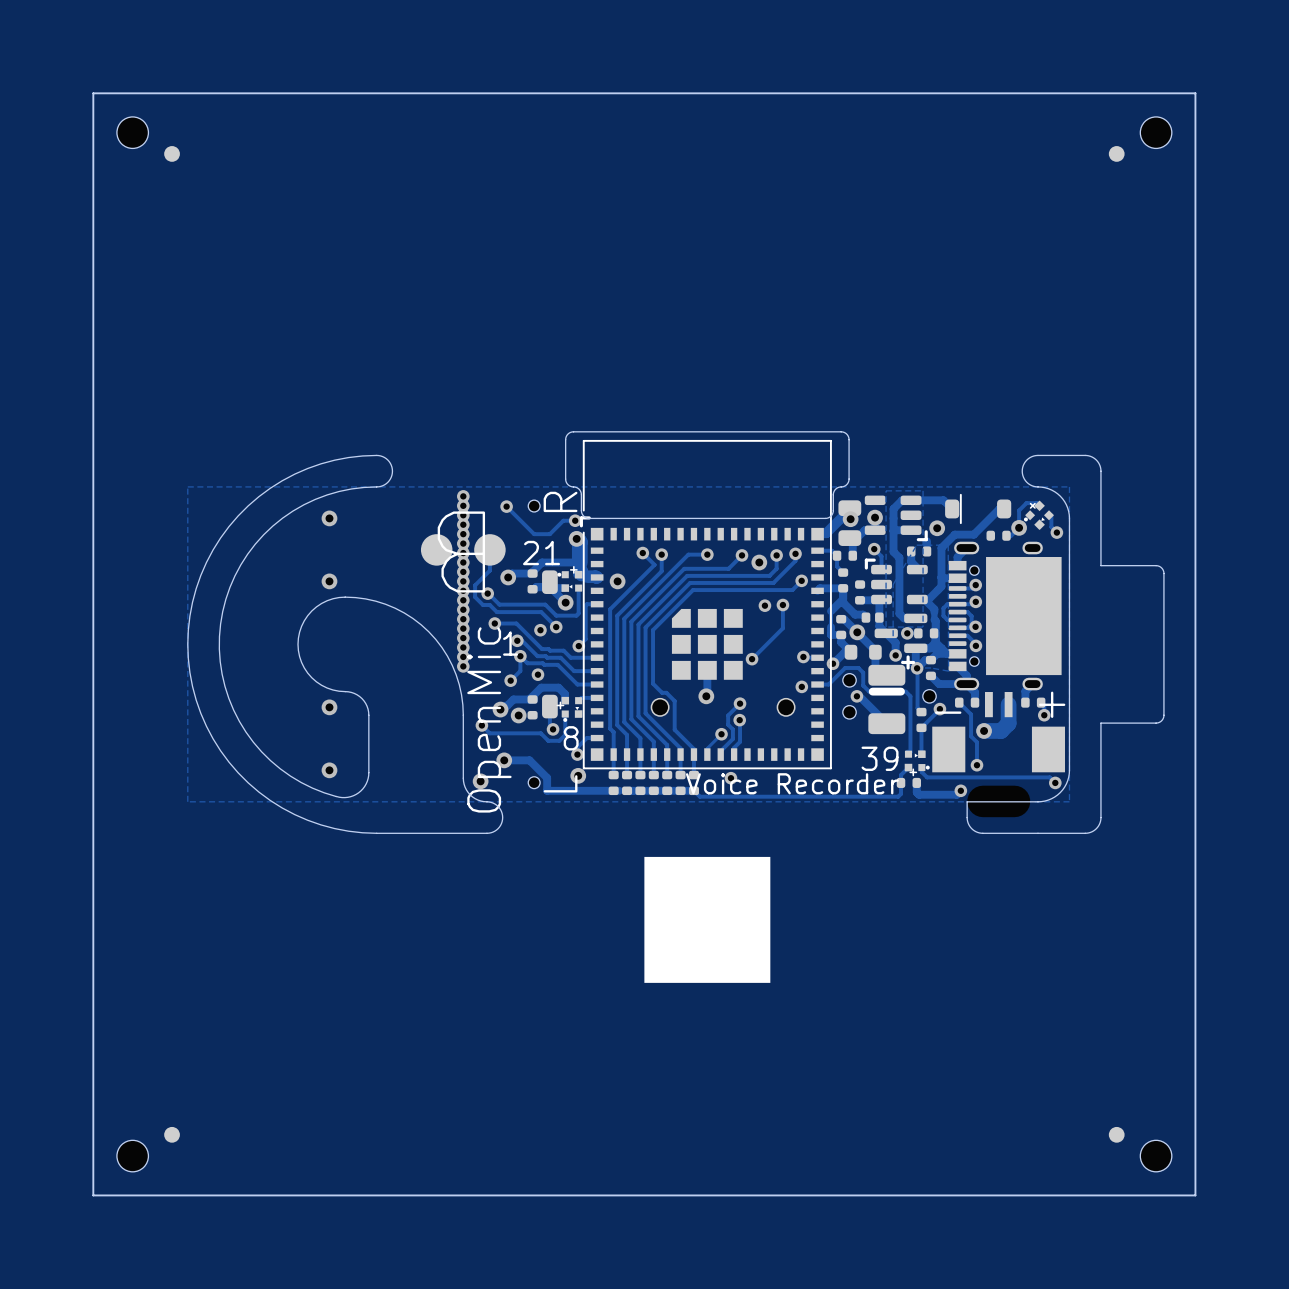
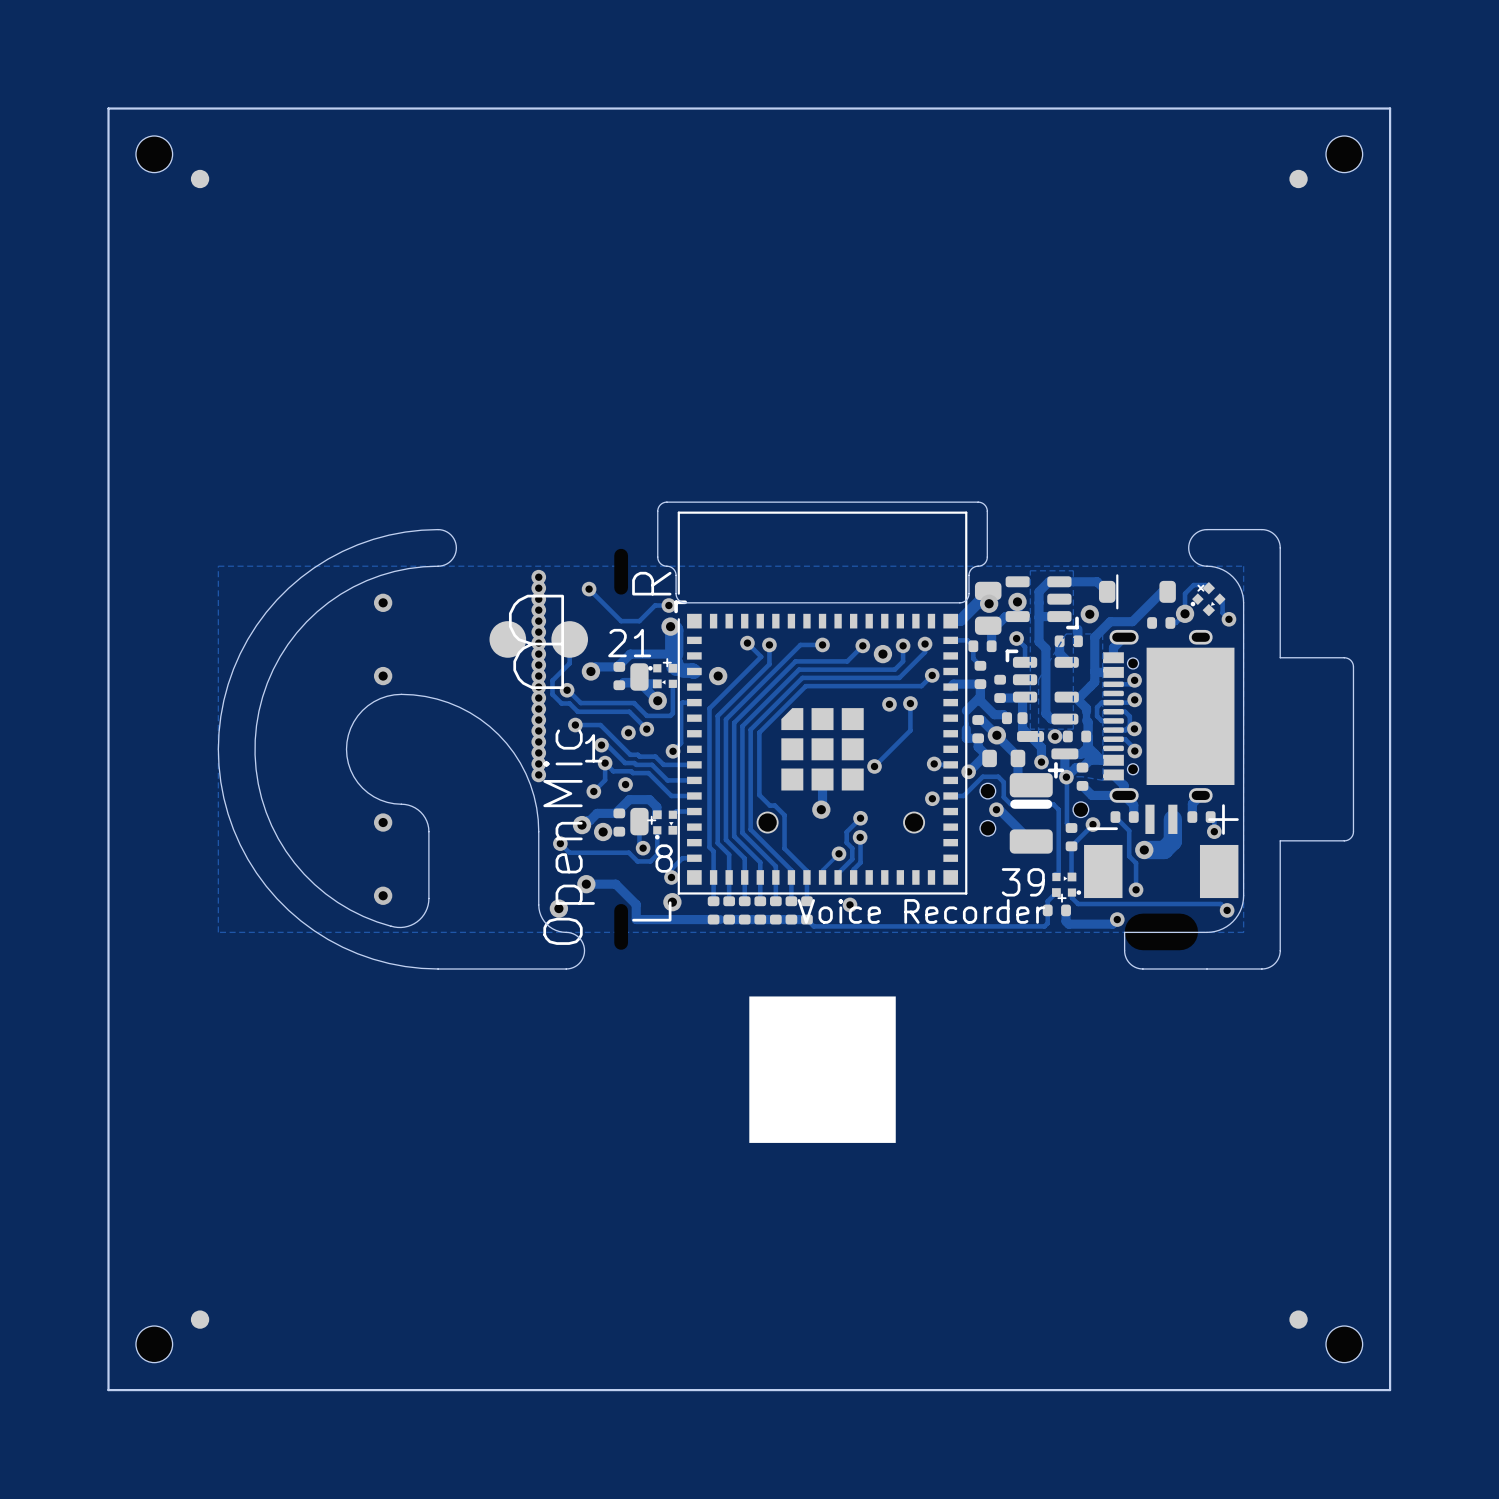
part footprint: [528, 500, 541, 512] -> [614, 548, 629, 595]
part footprint: [528, 776, 541, 789] -> [614, 904, 629, 950]

